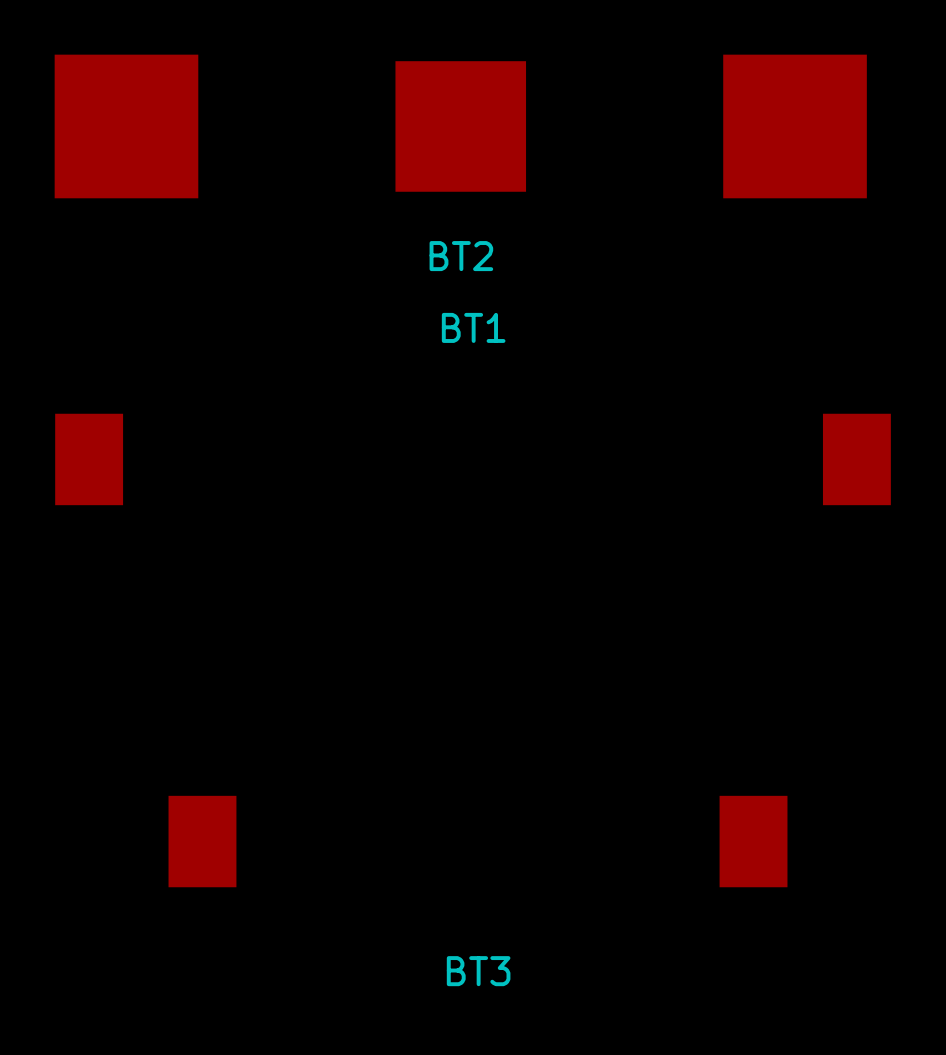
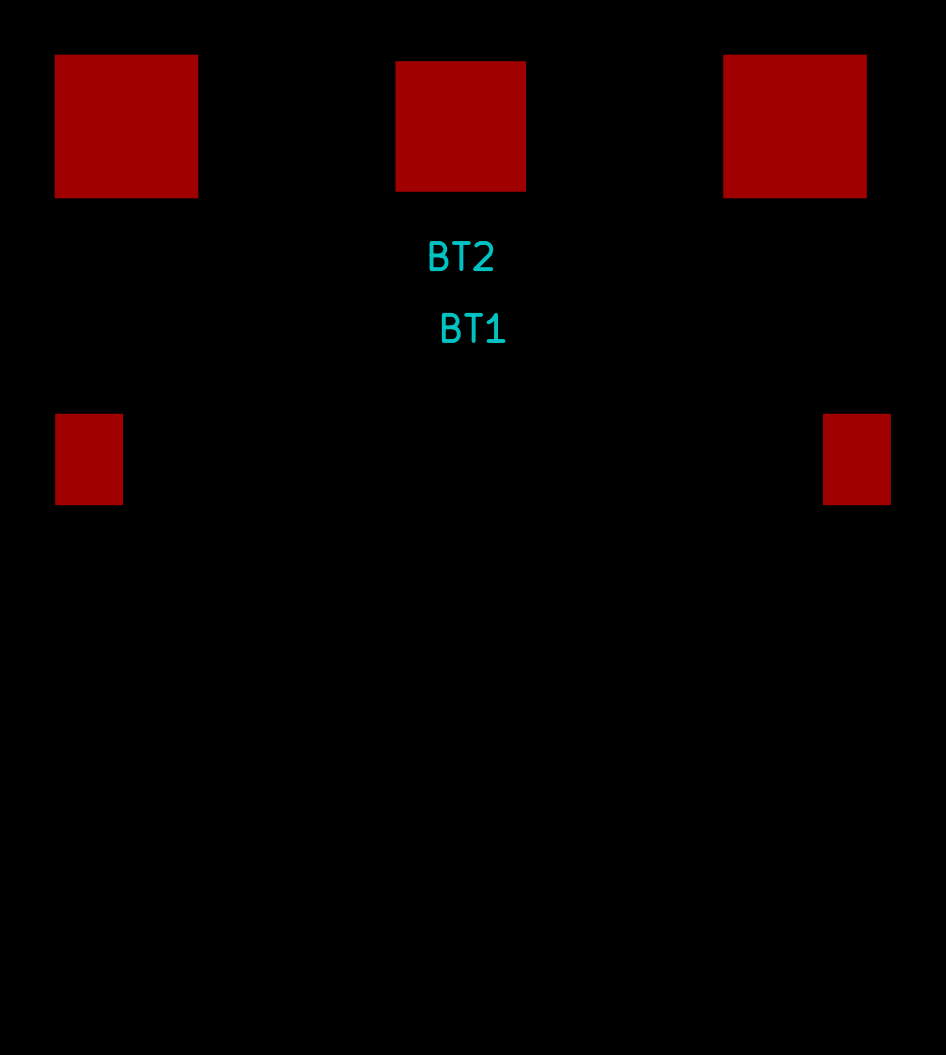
BT3: (478, 841) -> none

